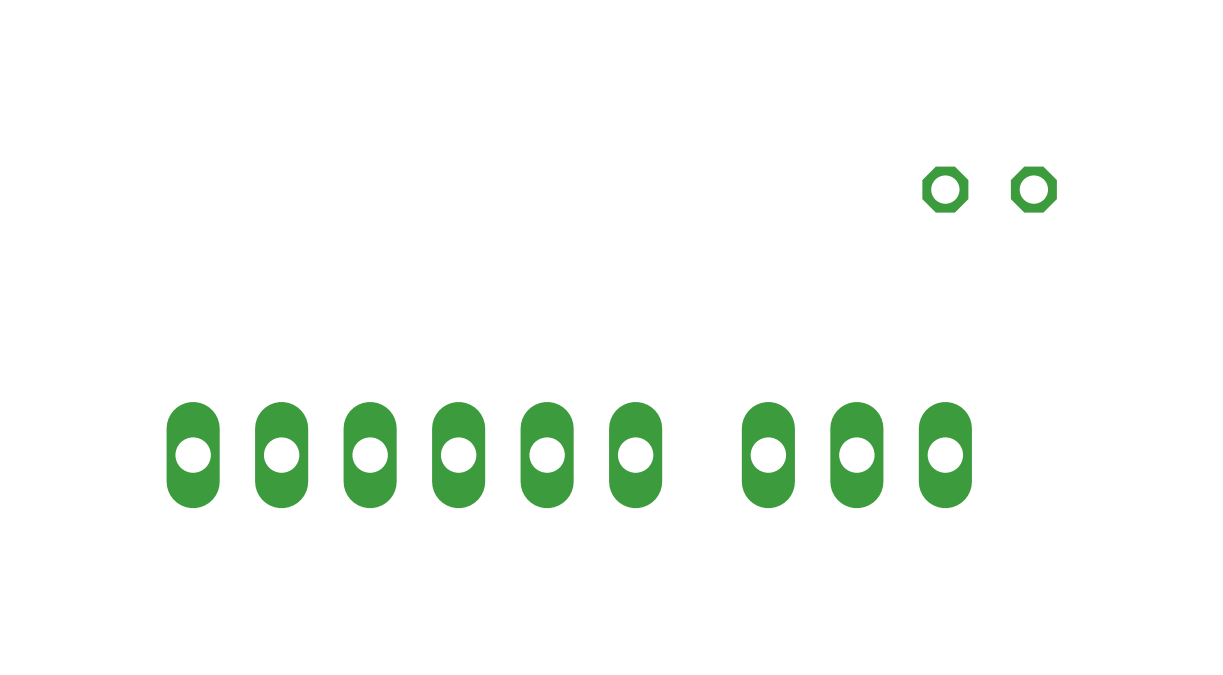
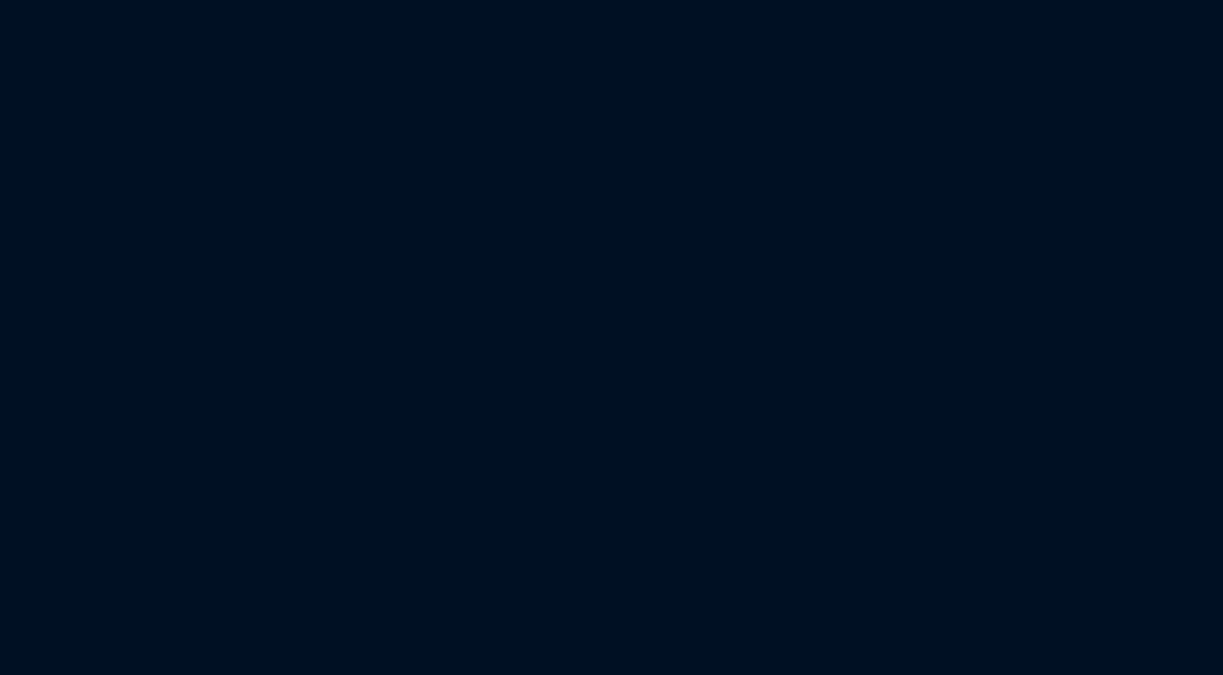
part: (989, 189) -> none
part: (414, 455) -> none
part: (856, 455) -> none

